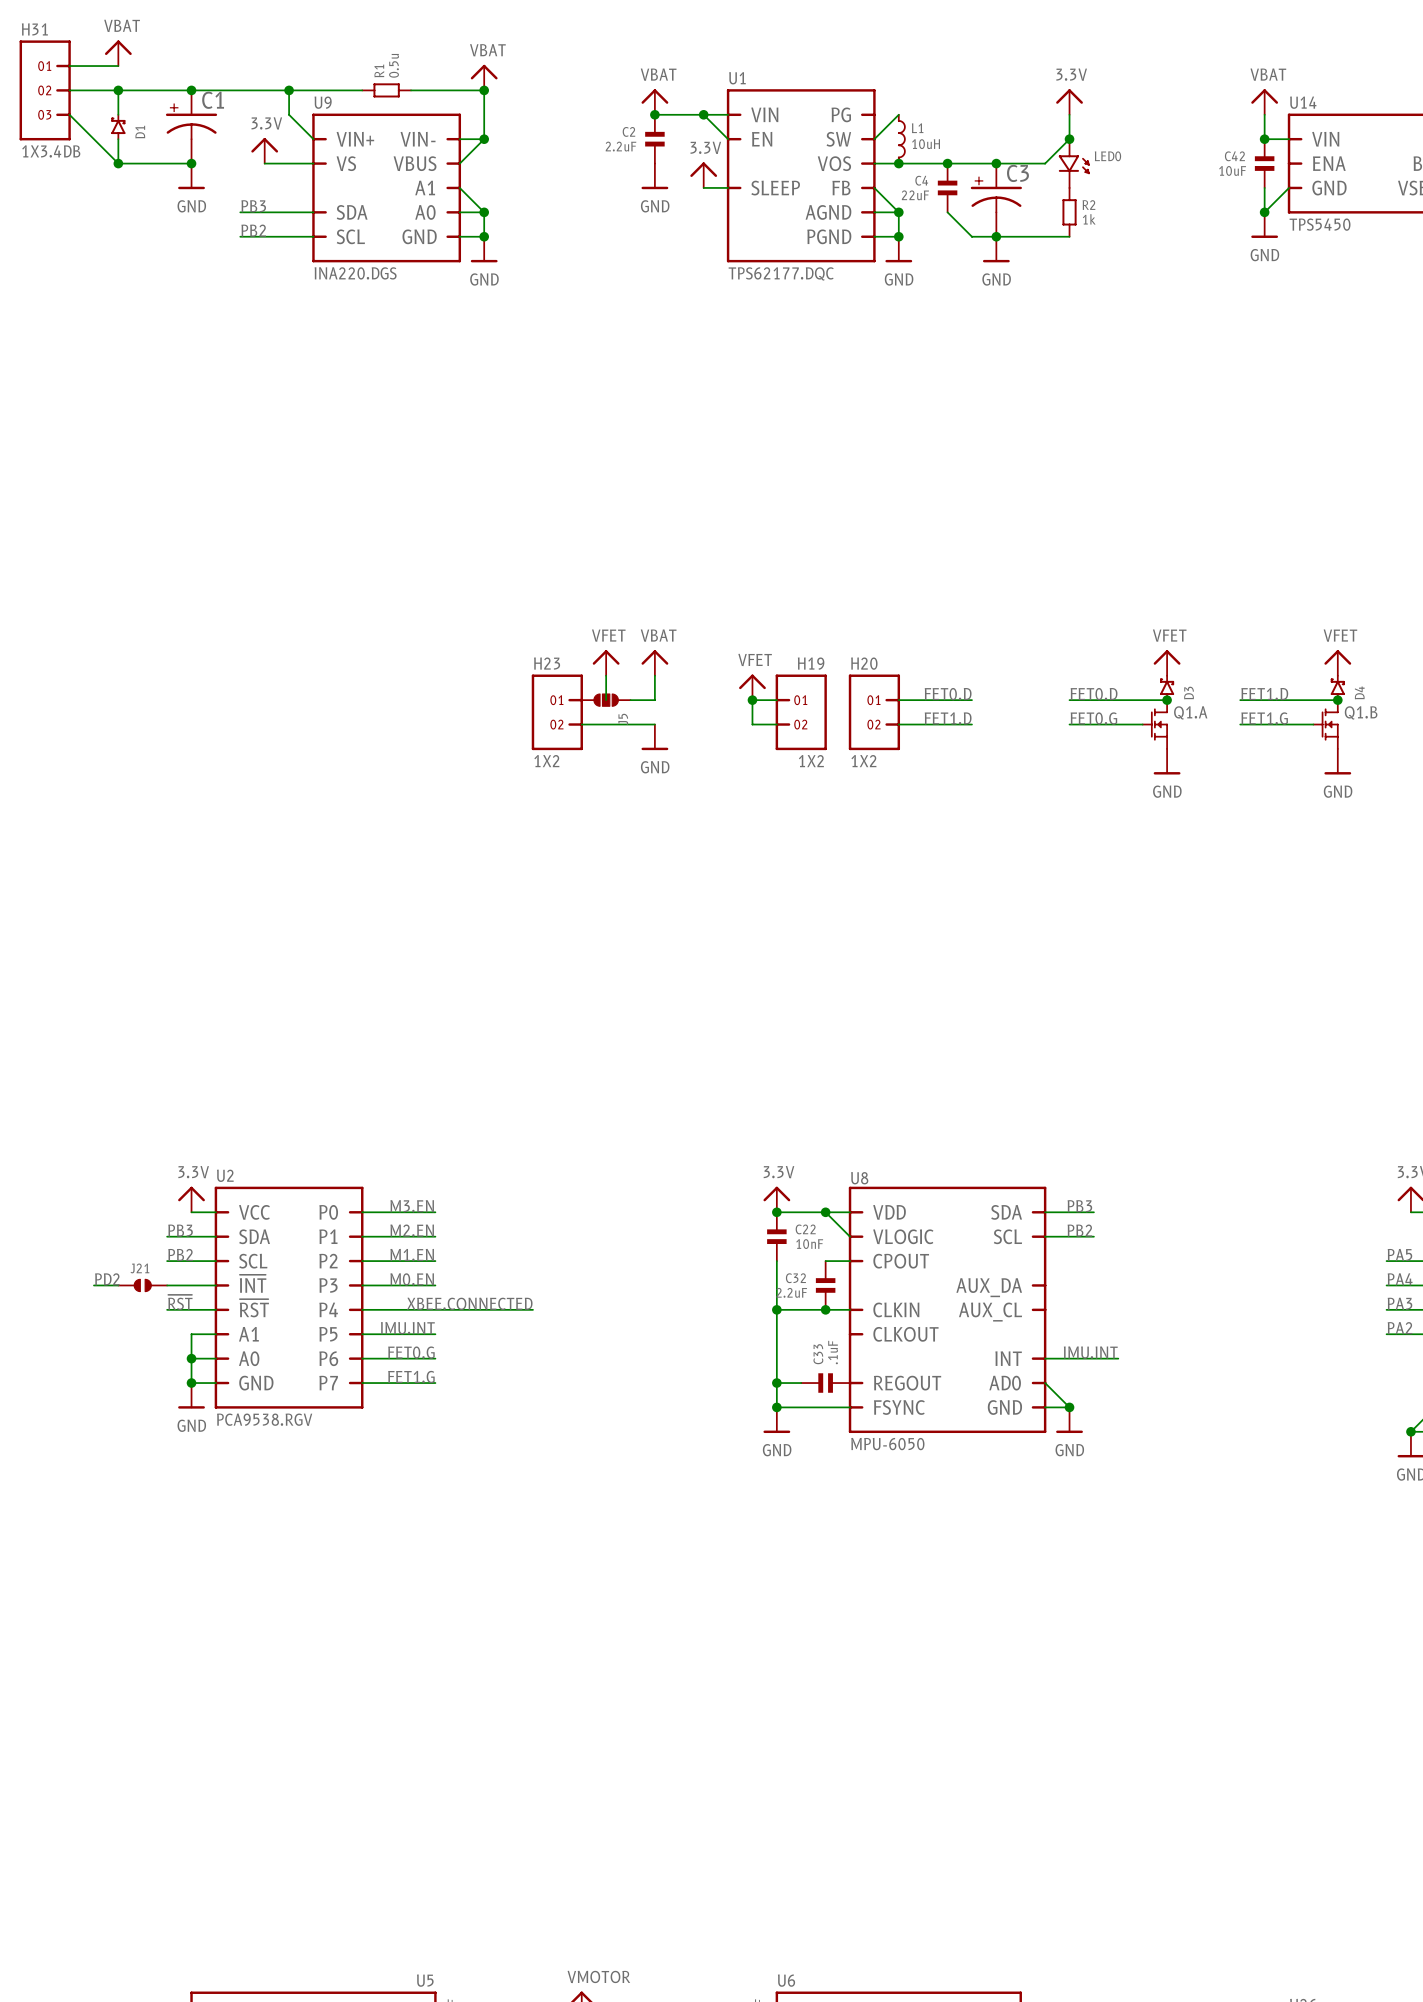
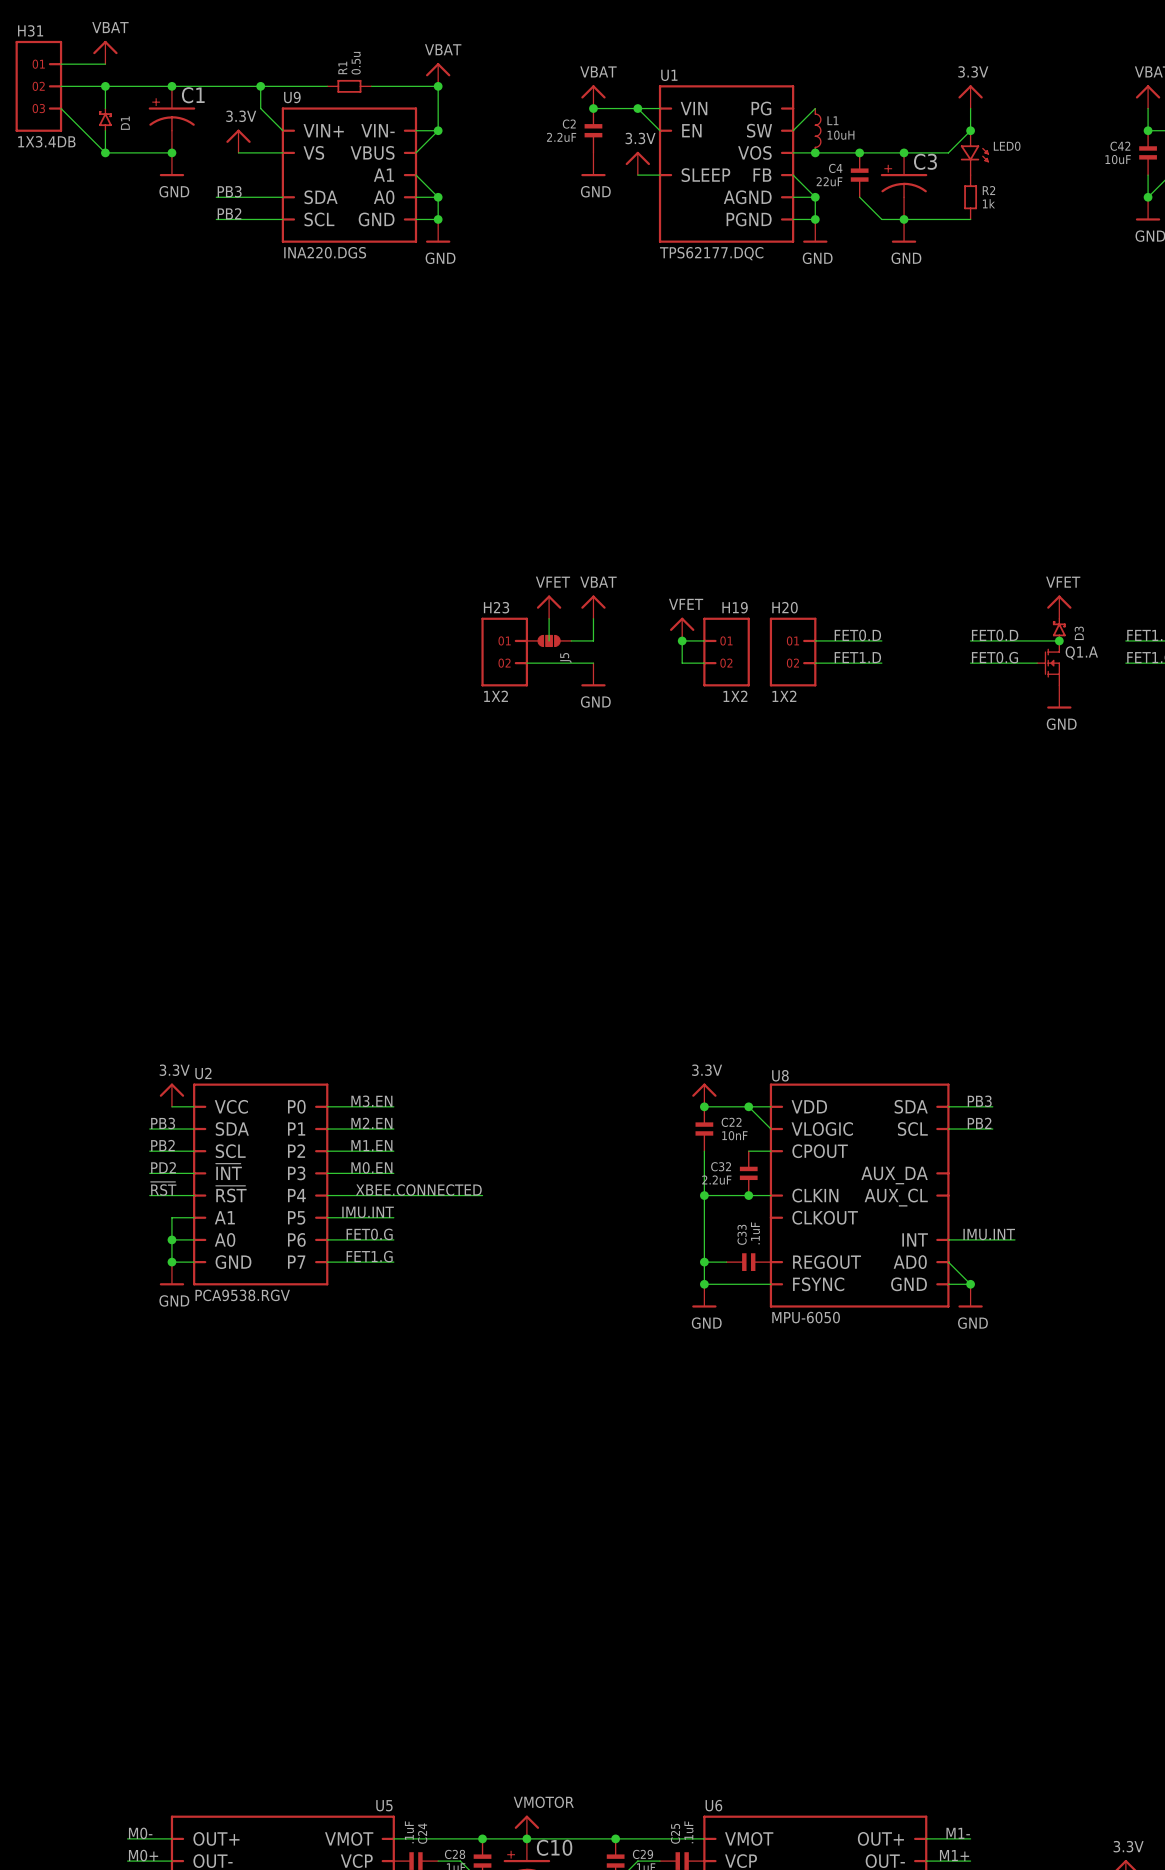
label position: PD2 (107, 1279) -> PD2 (163, 1167)
wire: (93, 1285) (118, 1285) -> none
J21: (142, 1285) -> none

